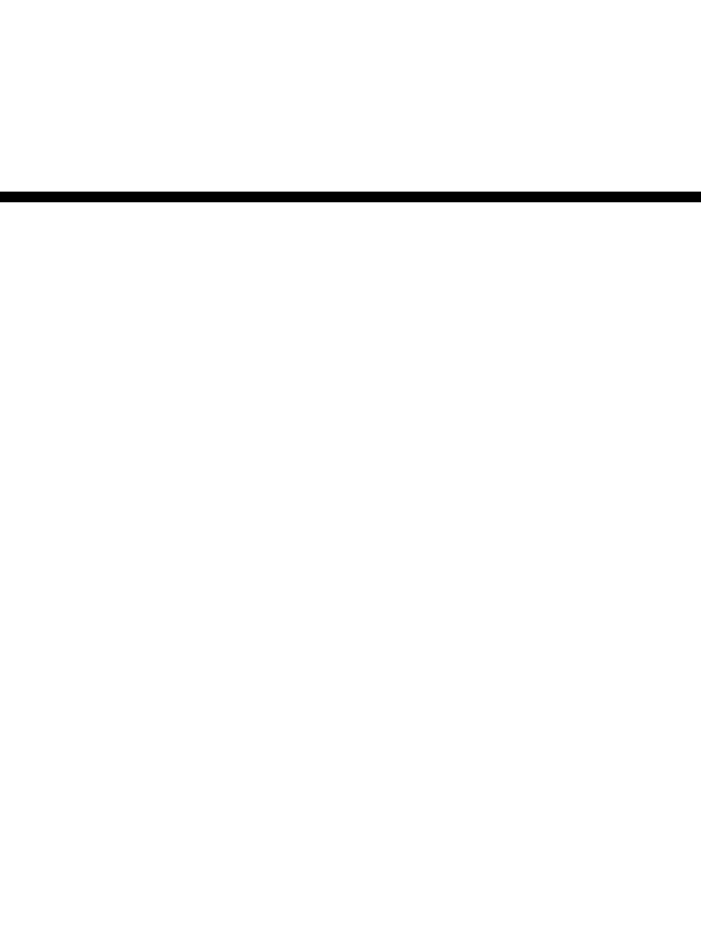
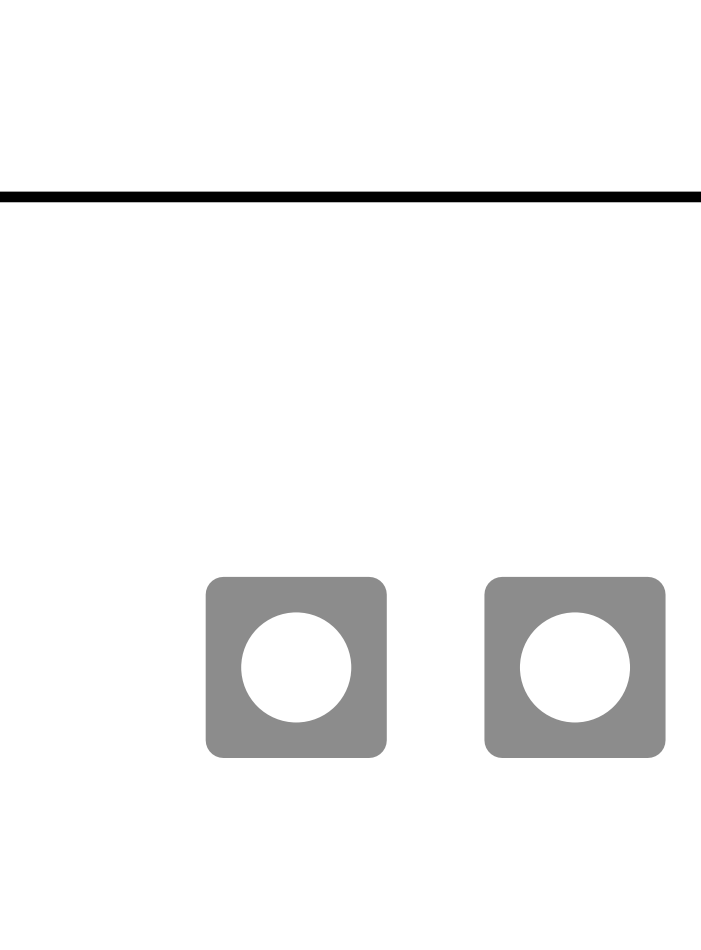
part: none -> (296, 667)
part: none -> (574, 667)

